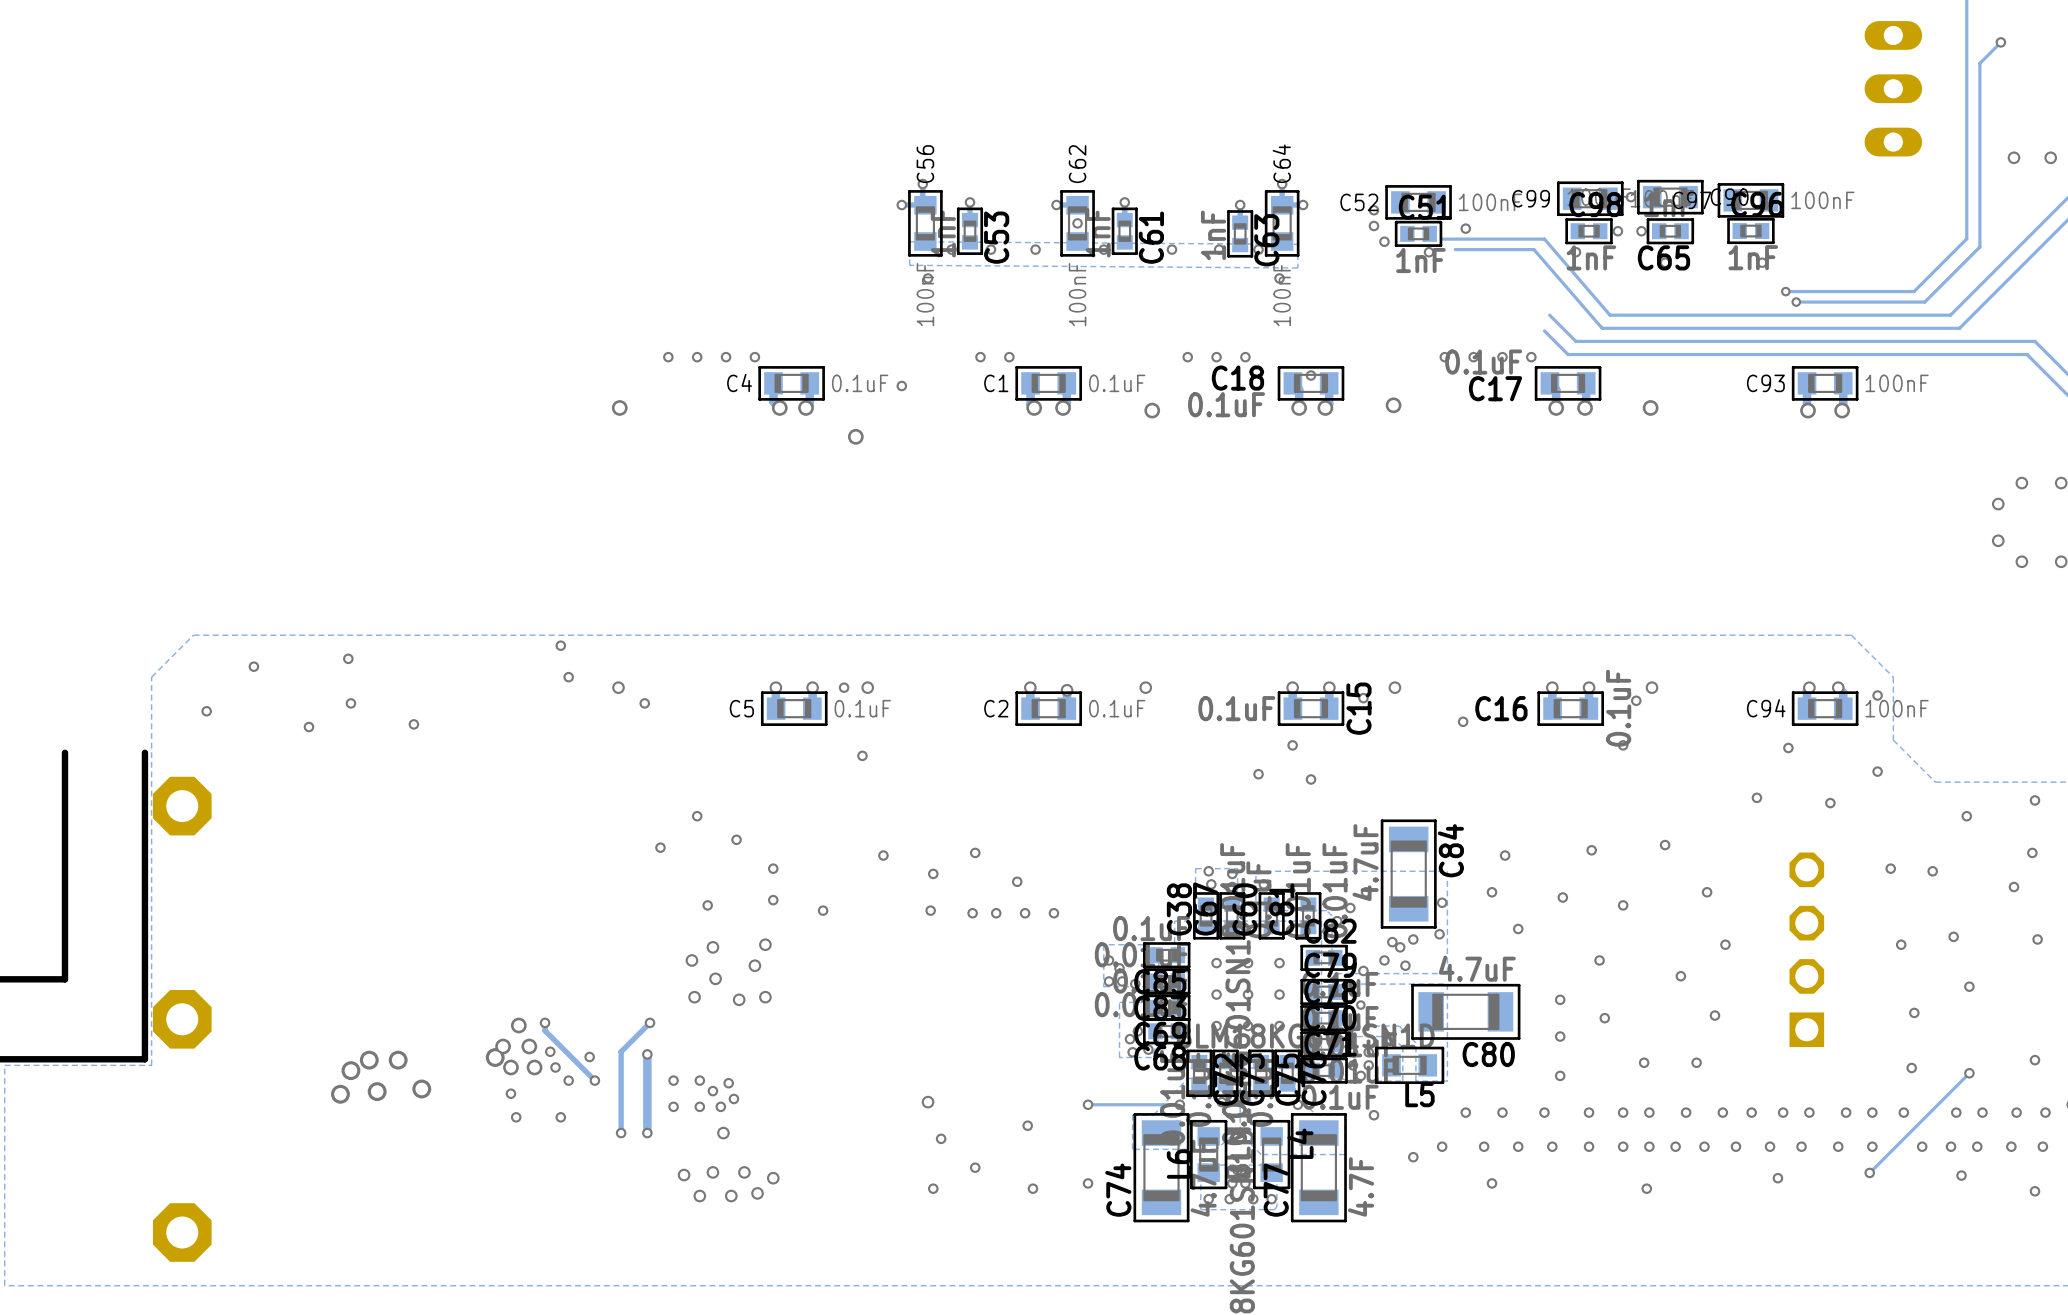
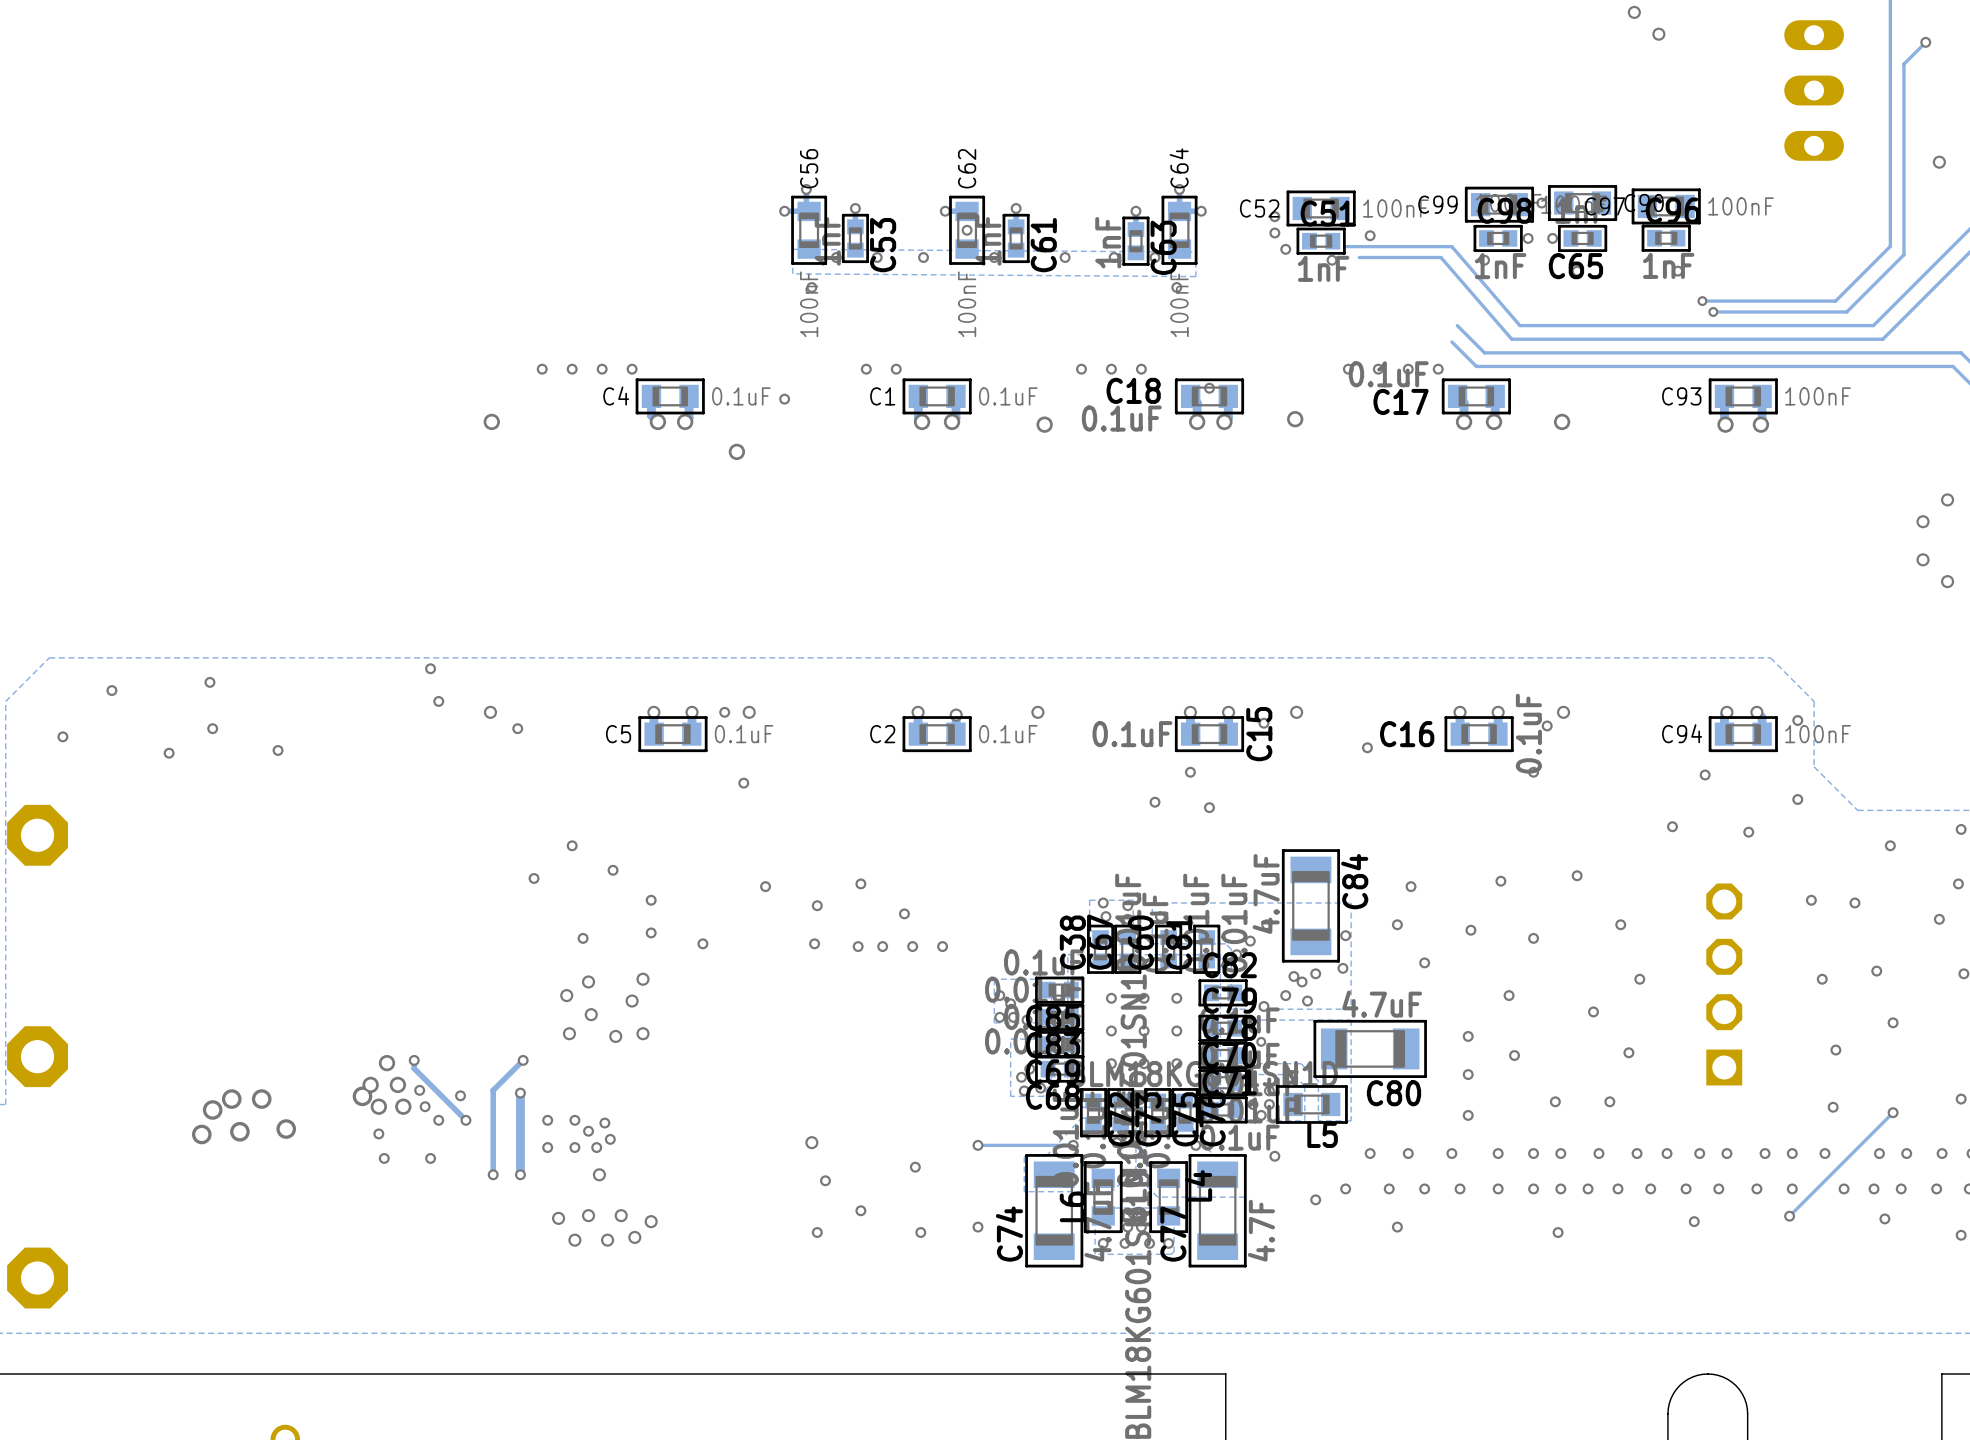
via: none -> (1634, 12)
via: none -> (1658, 34)

